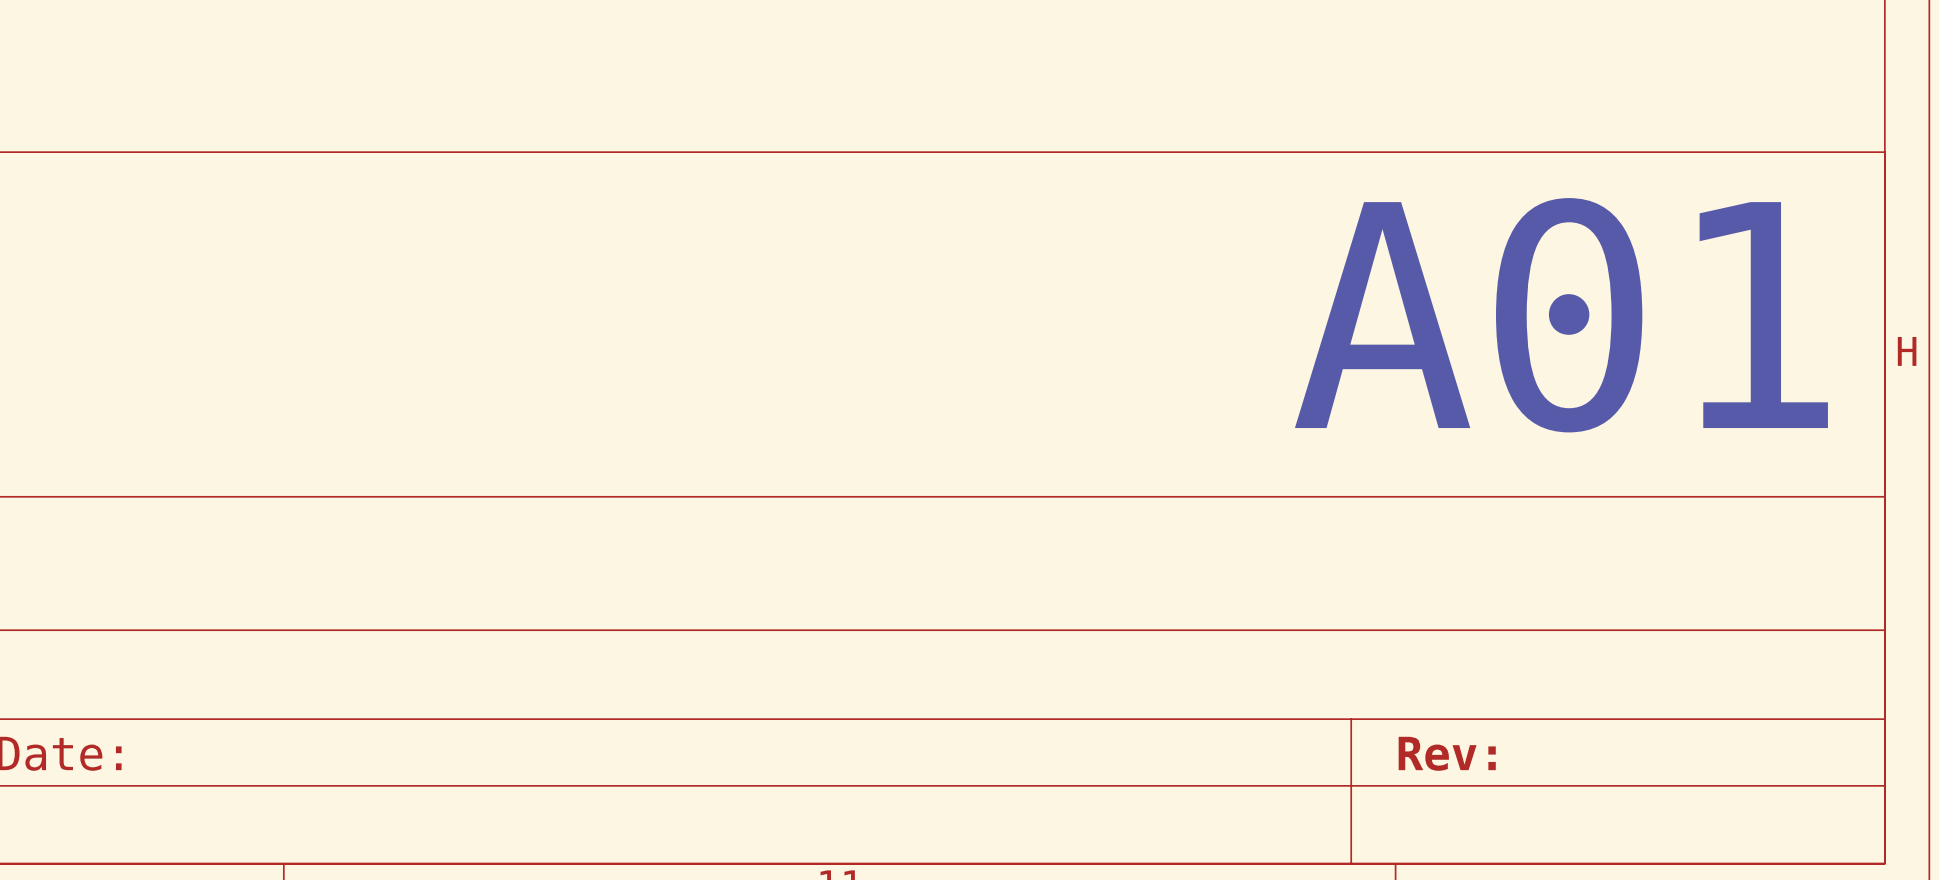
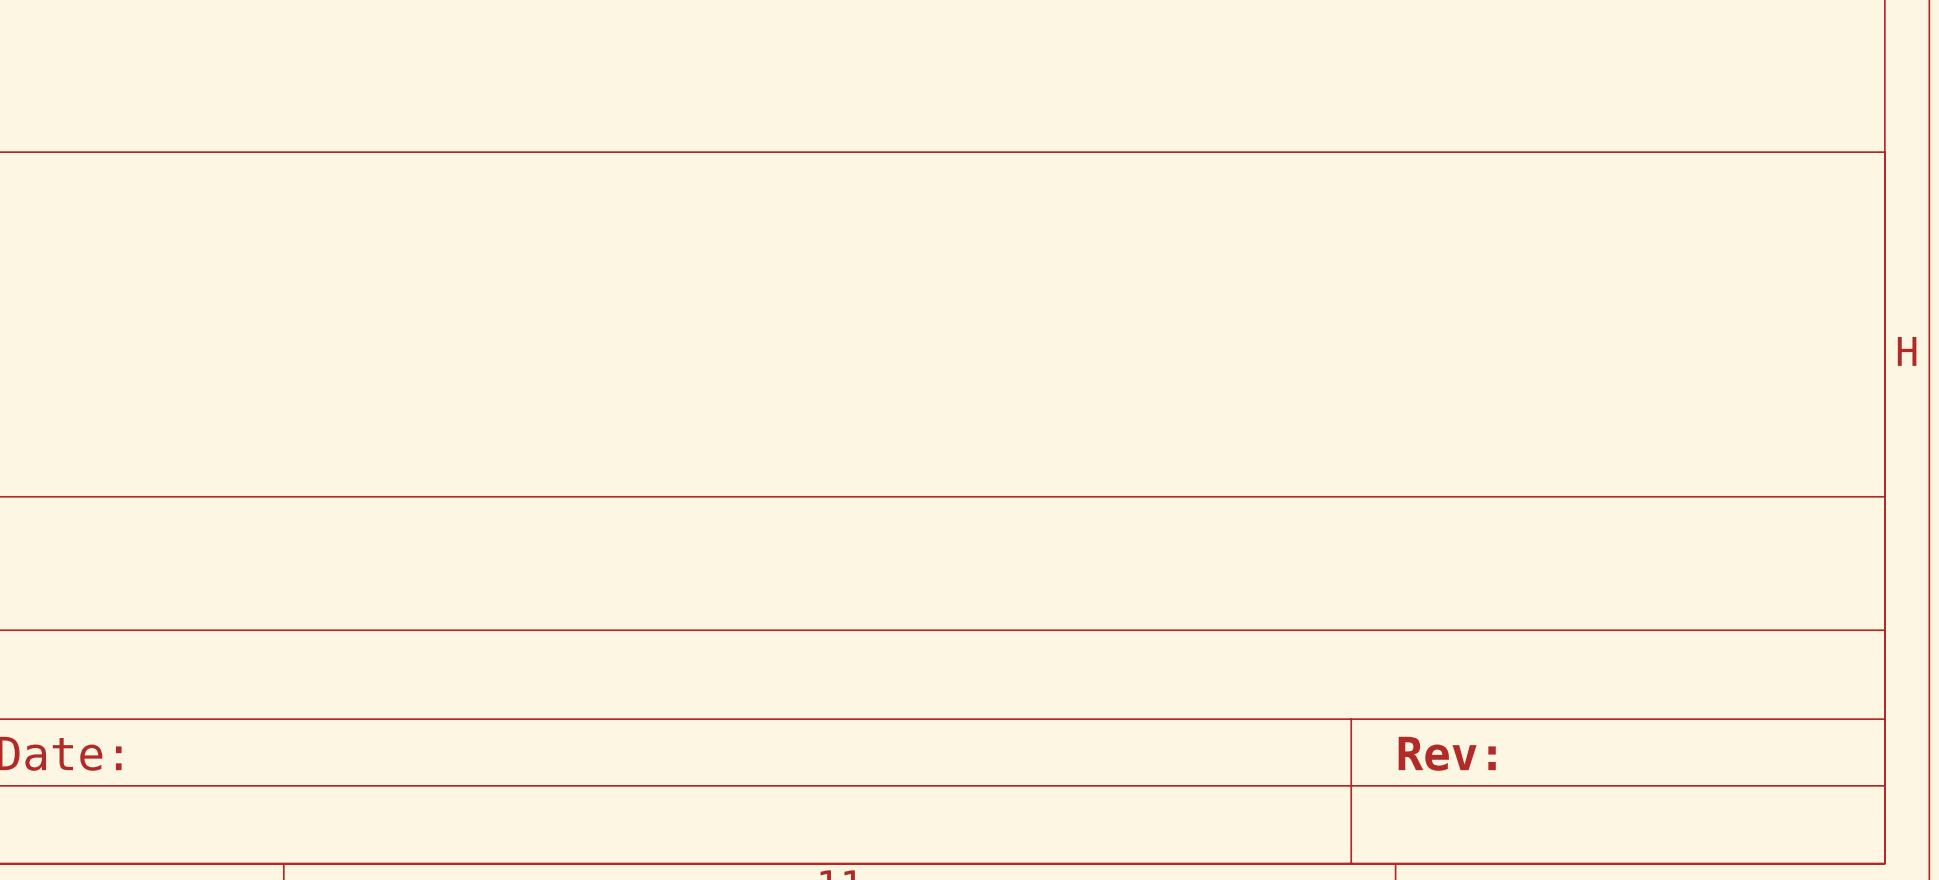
text: A01 (1561, 315) -> none

